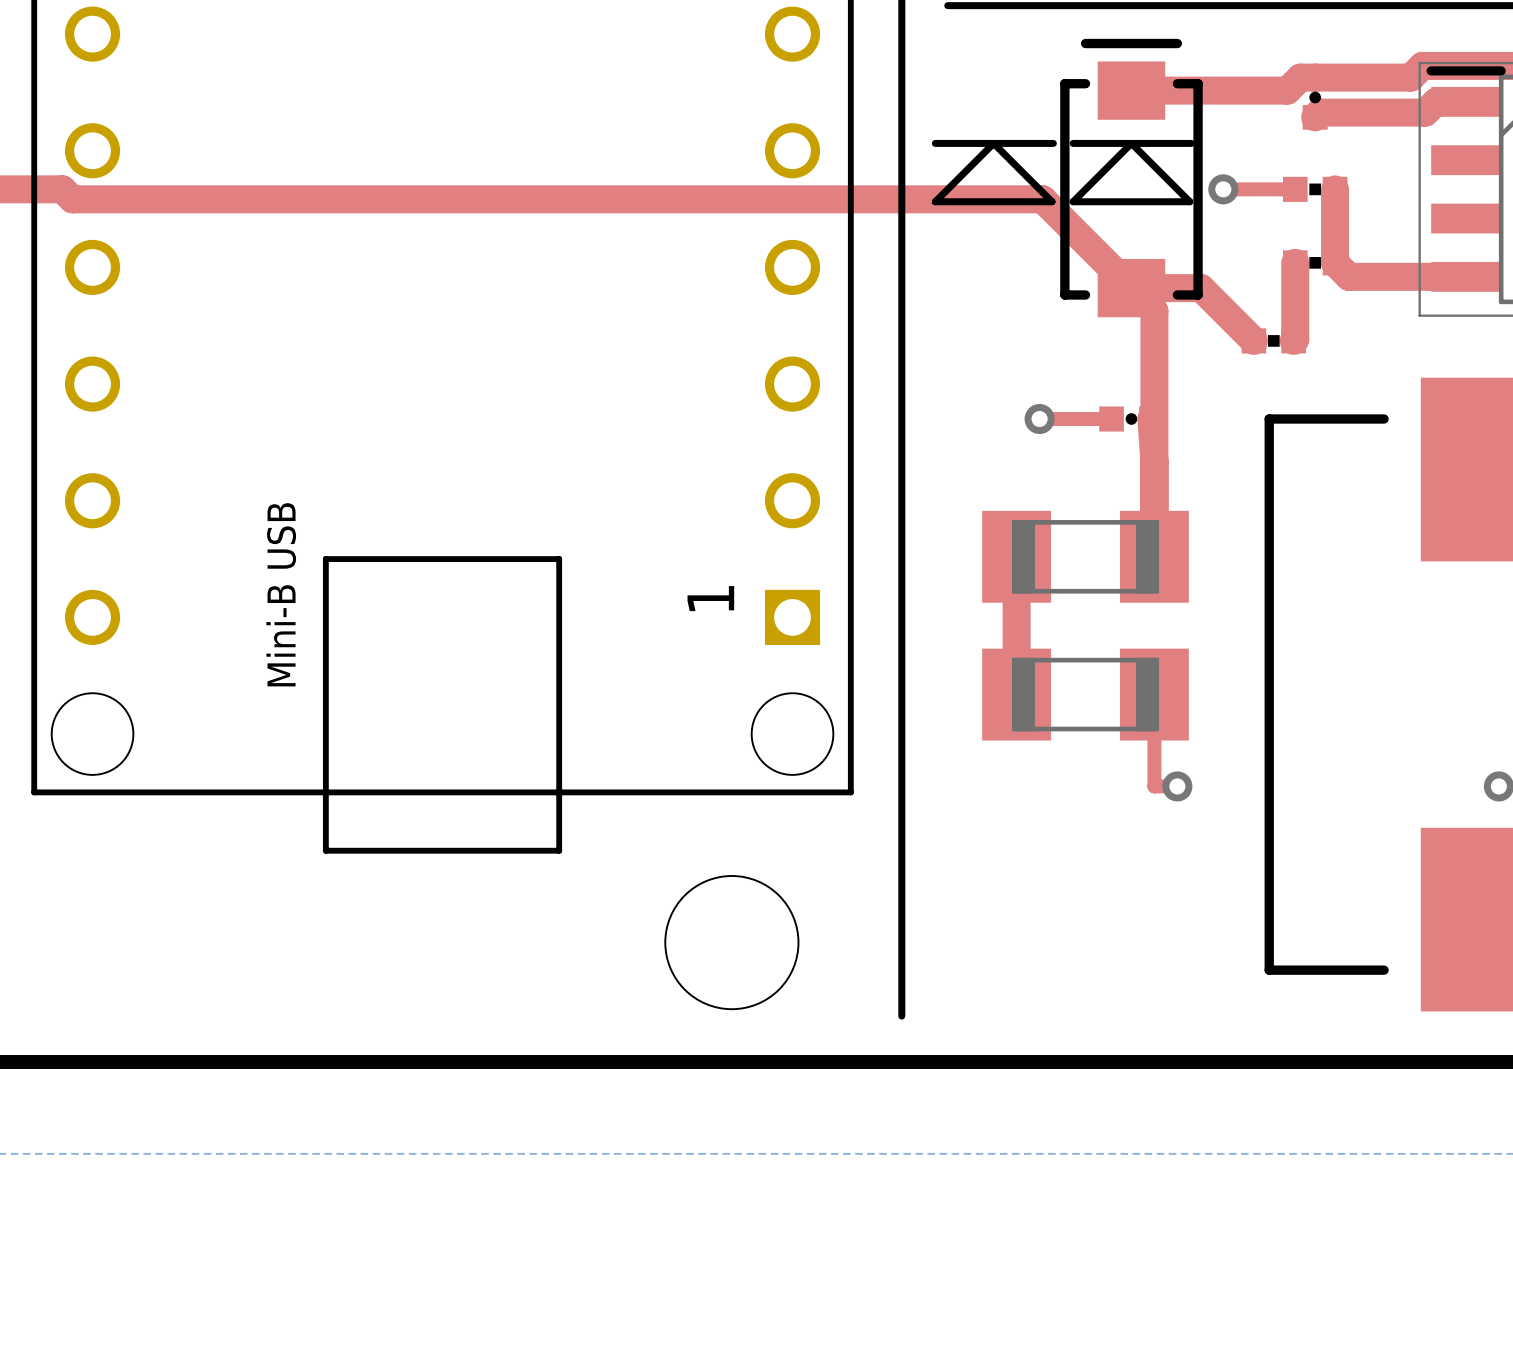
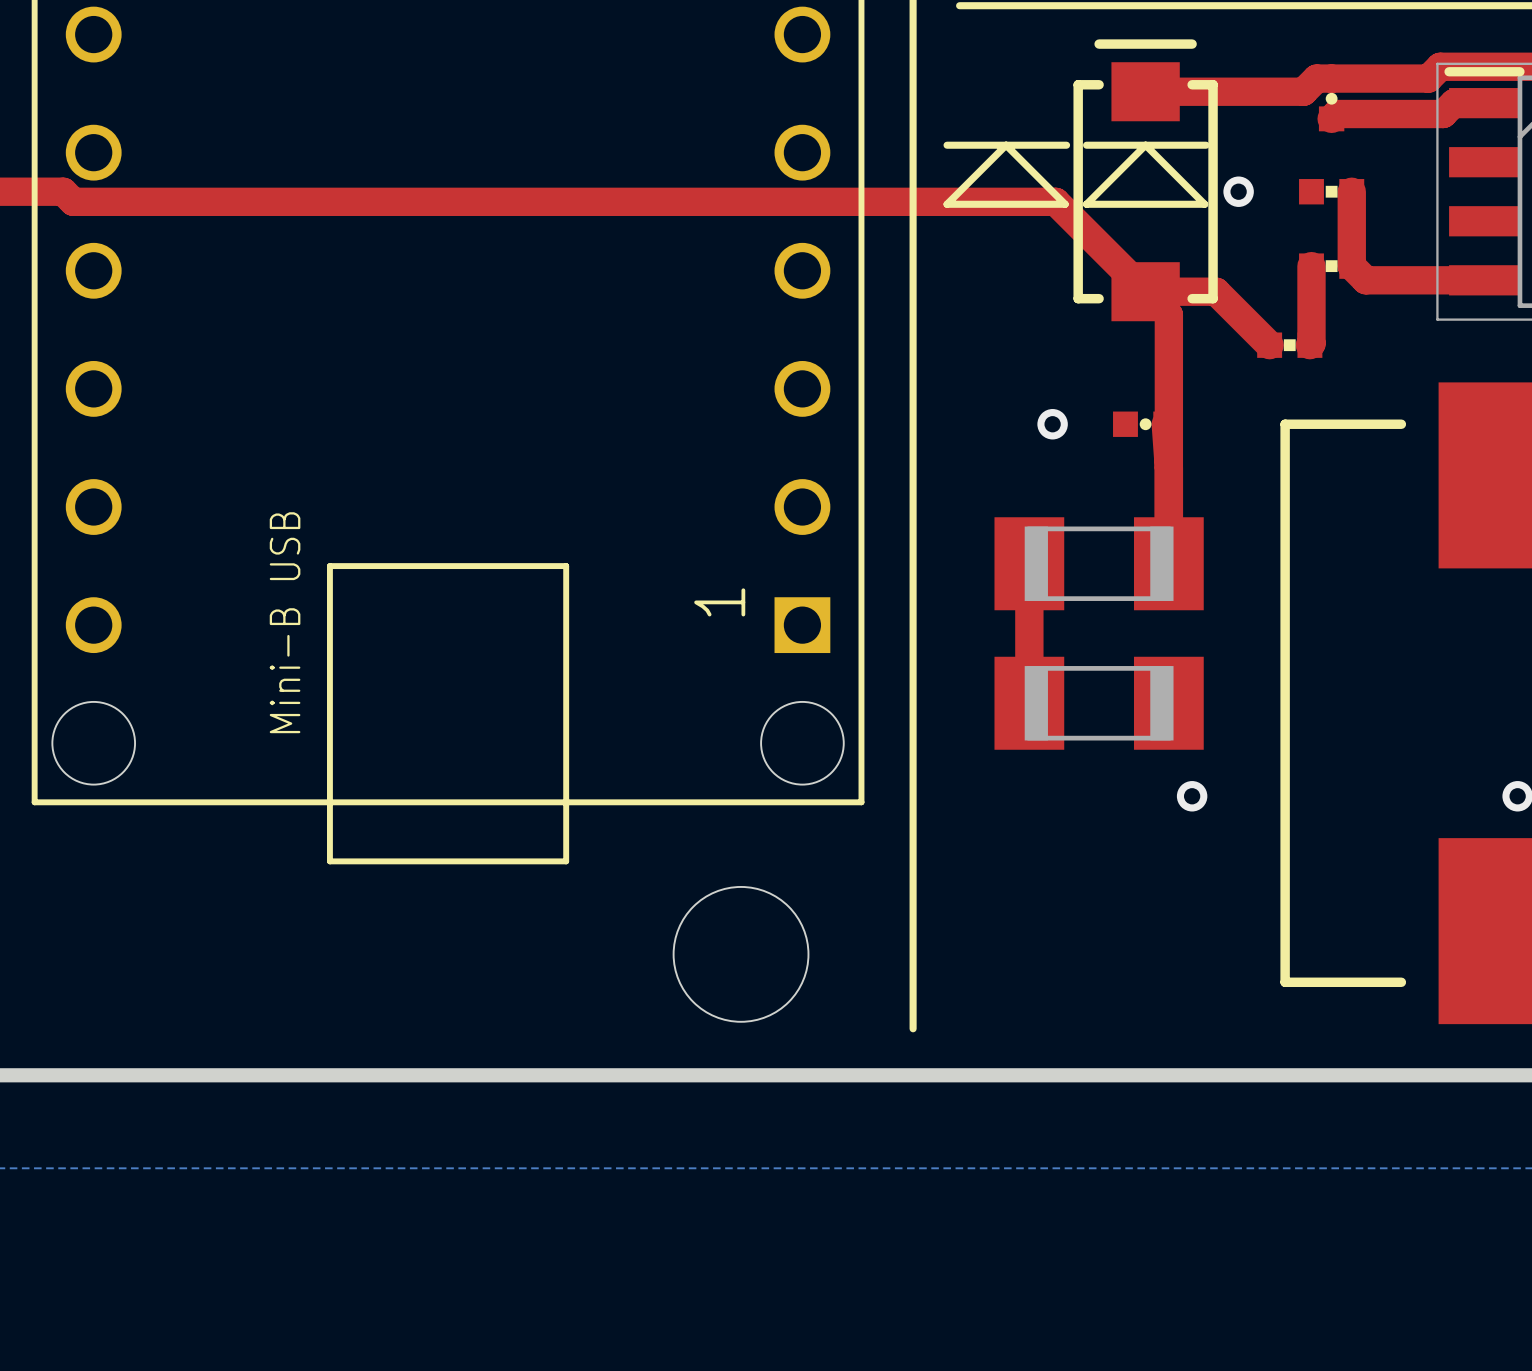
top track: (1223, 189) (1295, 189) -> none
top track: (1039, 419) (1111, 419) -> none
top track: (1154, 694) (1154, 786) (1177, 786) -> none

